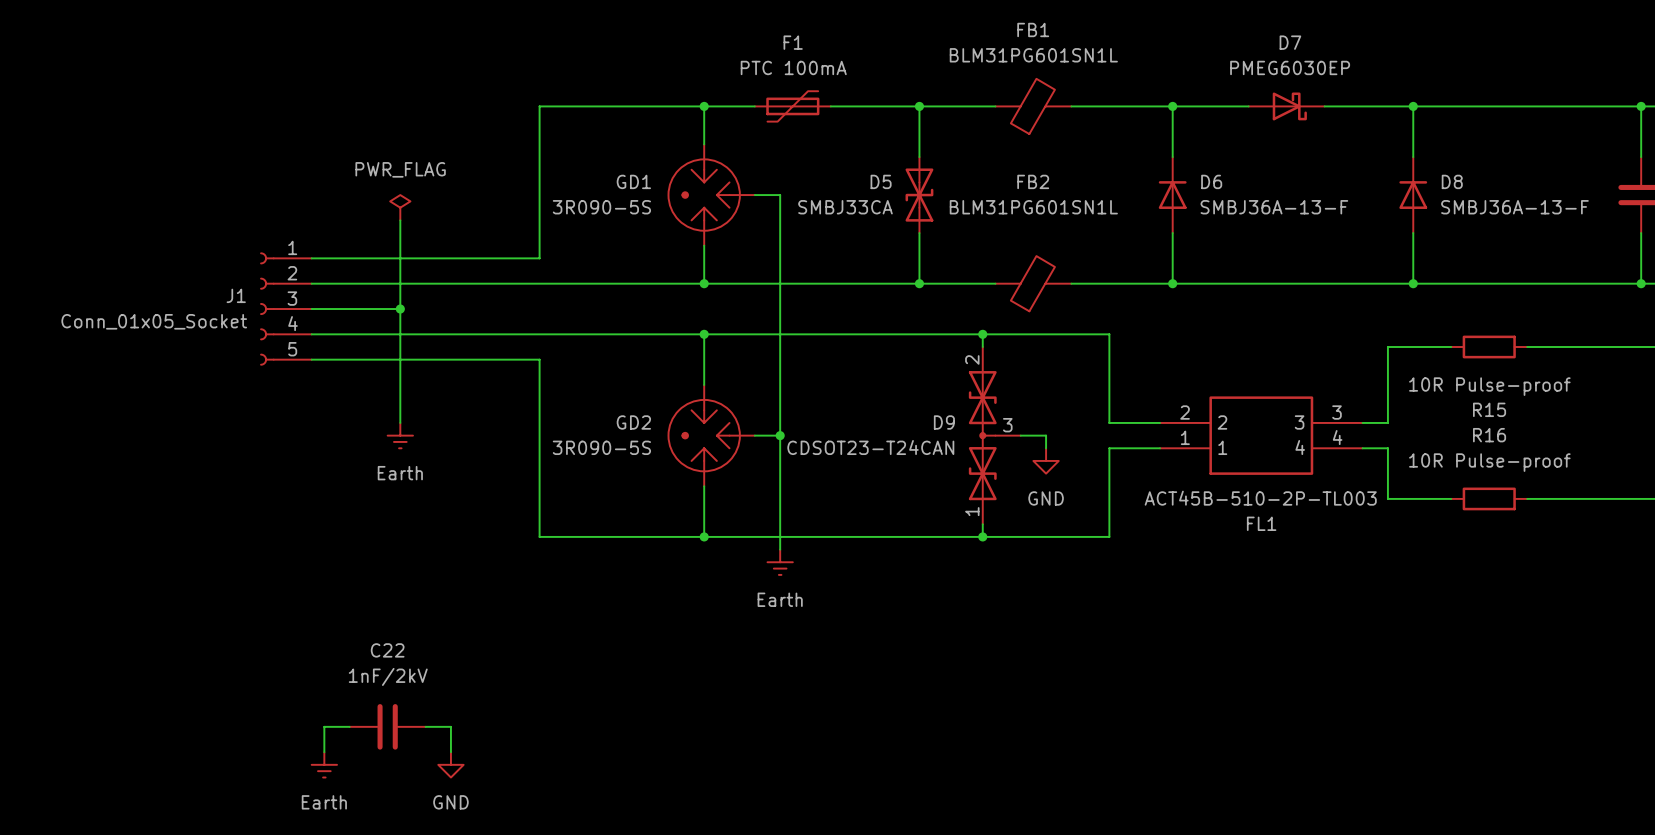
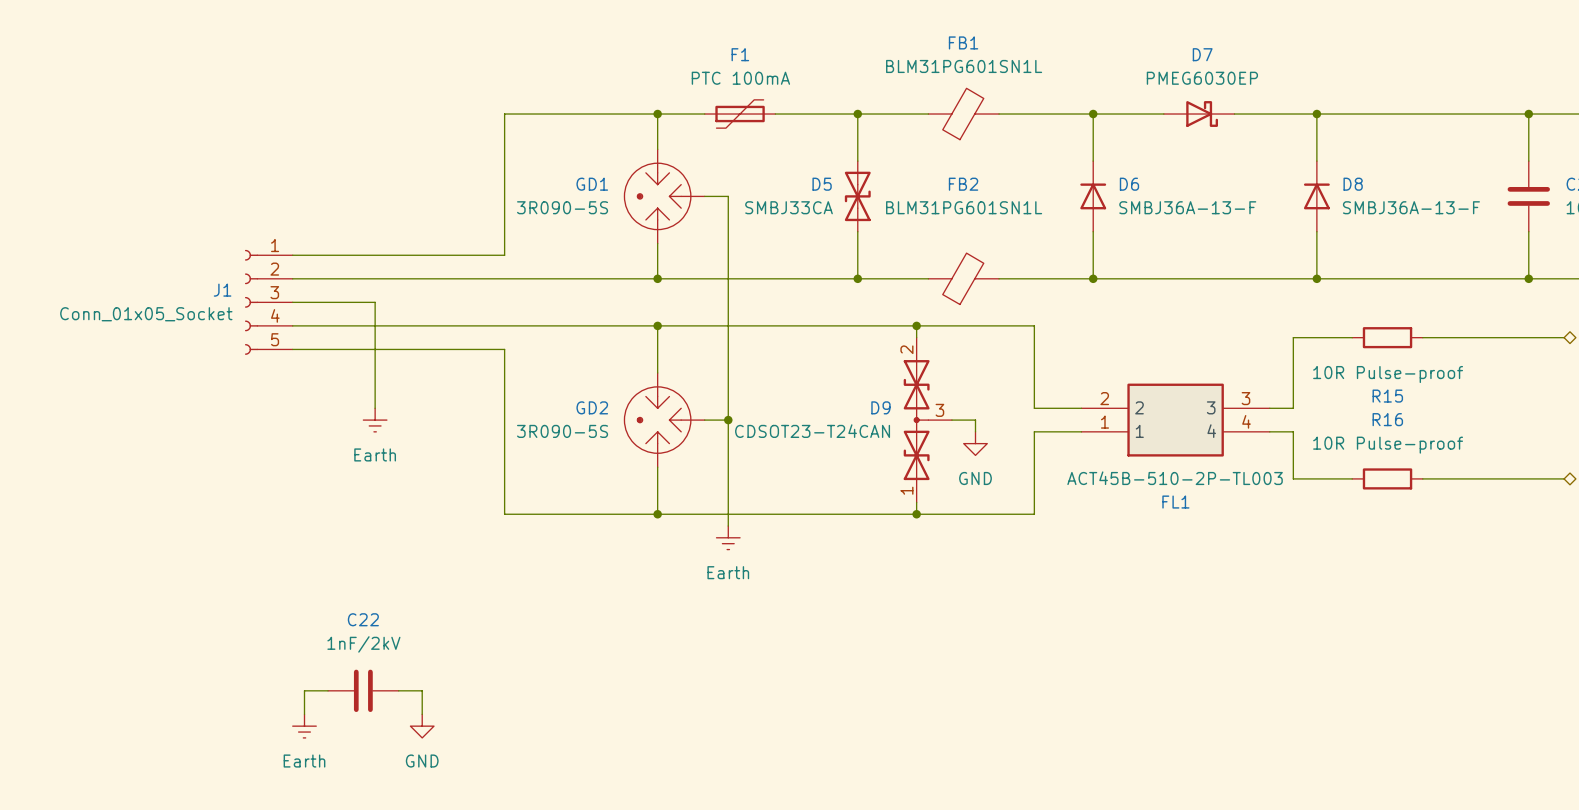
power symbol: PWR_FLAG (400, 207) -> none
wire: (400, 220) (400, 309) -> none
junction: (400, 309) -> none

